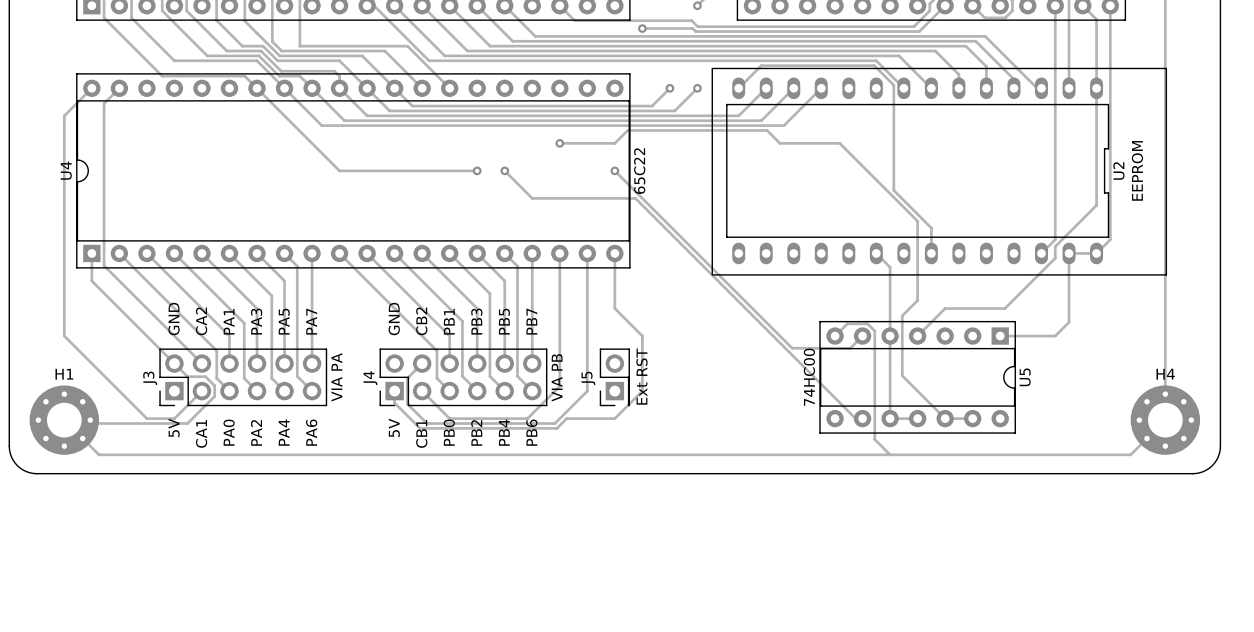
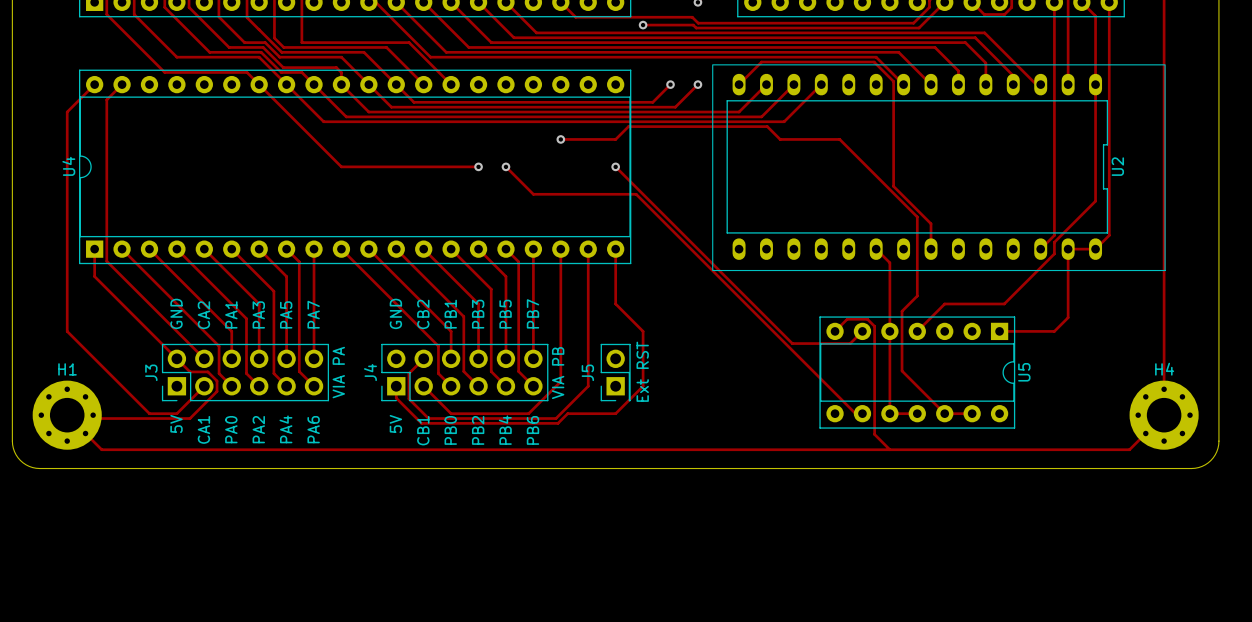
U2 value: EEPROM (1137, 170) -> none
U4 value: 65C22 (639, 171) -> none
U5 value: 74HC00 (809, 377) -> none

